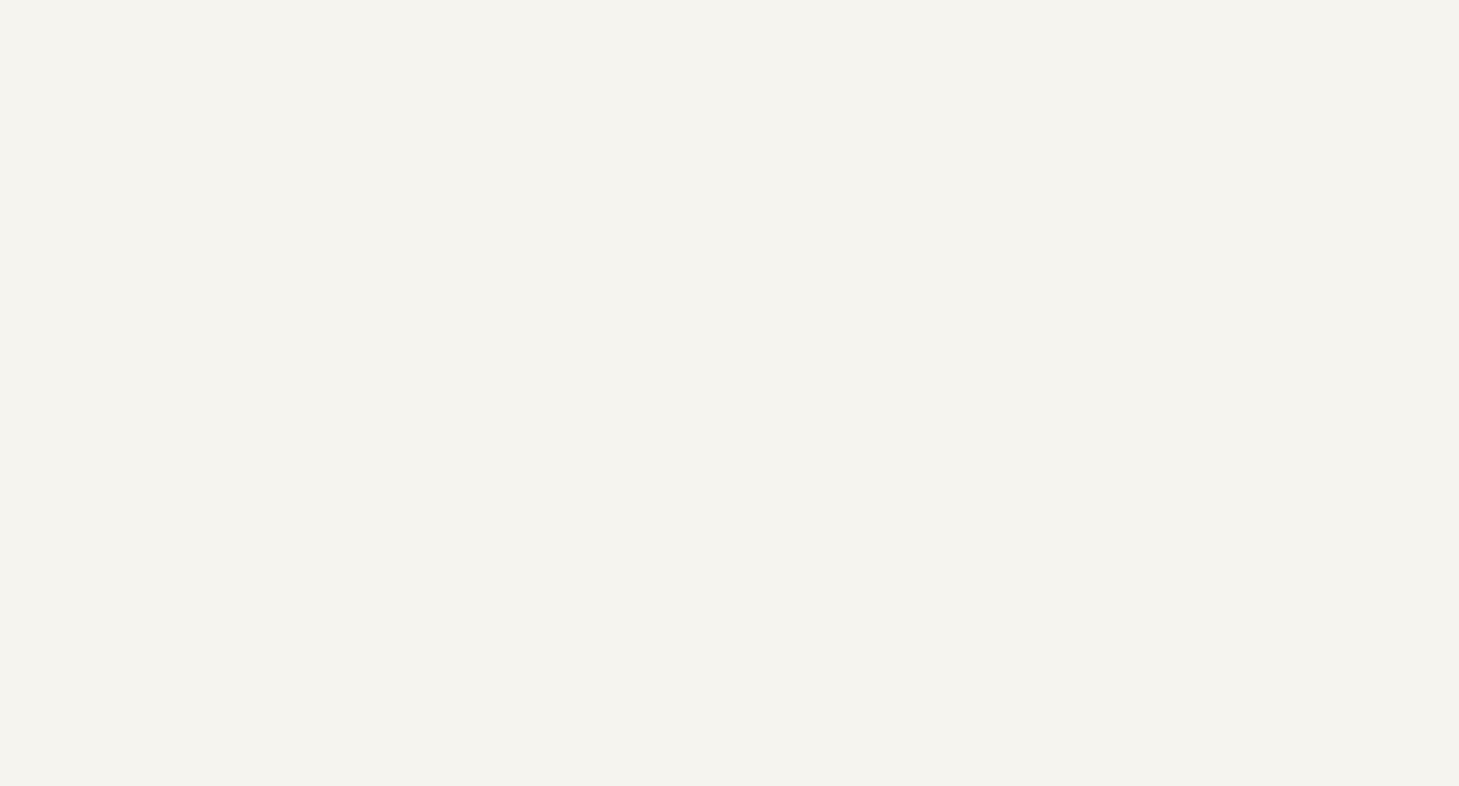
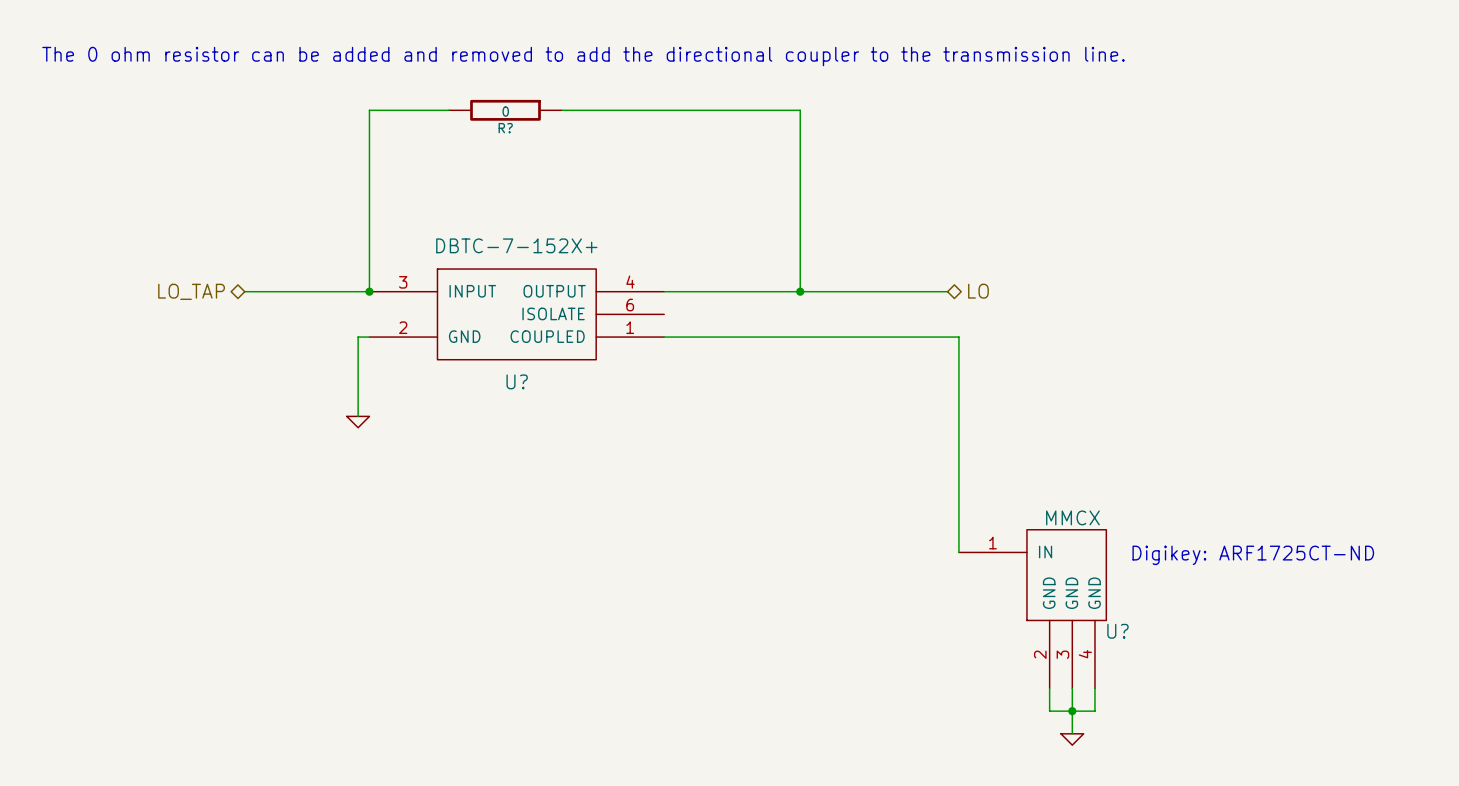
text: none -> The 0 ohm resistor can be added and removed to add the directional coupler to the transmission line. (583, 56)
wire: none -> (448, 110) (369, 110) (369, 291) (244, 291)
R?: none -> 0 (505, 110)
wire: none -> (562, 110) (800, 110) (800, 291)
hierarchical label: none -> LO_TAP (191, 291)
junction: none -> (369, 291)
wire: none -> (664, 291) (947, 291)
junction: none -> (800, 291)
hierarchical label: none -> LO (978, 291)
U?: none -> DBTC-7-152X+ (516, 314)
wire: none -> (369, 337) (358, 337) (358, 416)
wire: none -> (664, 337) (958, 337) (958, 552)
power symbol: none -> (358, 422)
text: none -> Digikey: ARF1725CT-ND (1253, 555)
U?: none -> MMCX (1032, 609)
wire: none -> (1049, 688) (1049, 711) (1094, 711) (1094, 688)
wire: none -> (1072, 688) (1072, 733)
junction: none -> (1072, 711)
power symbol: none -> (1072, 739)

